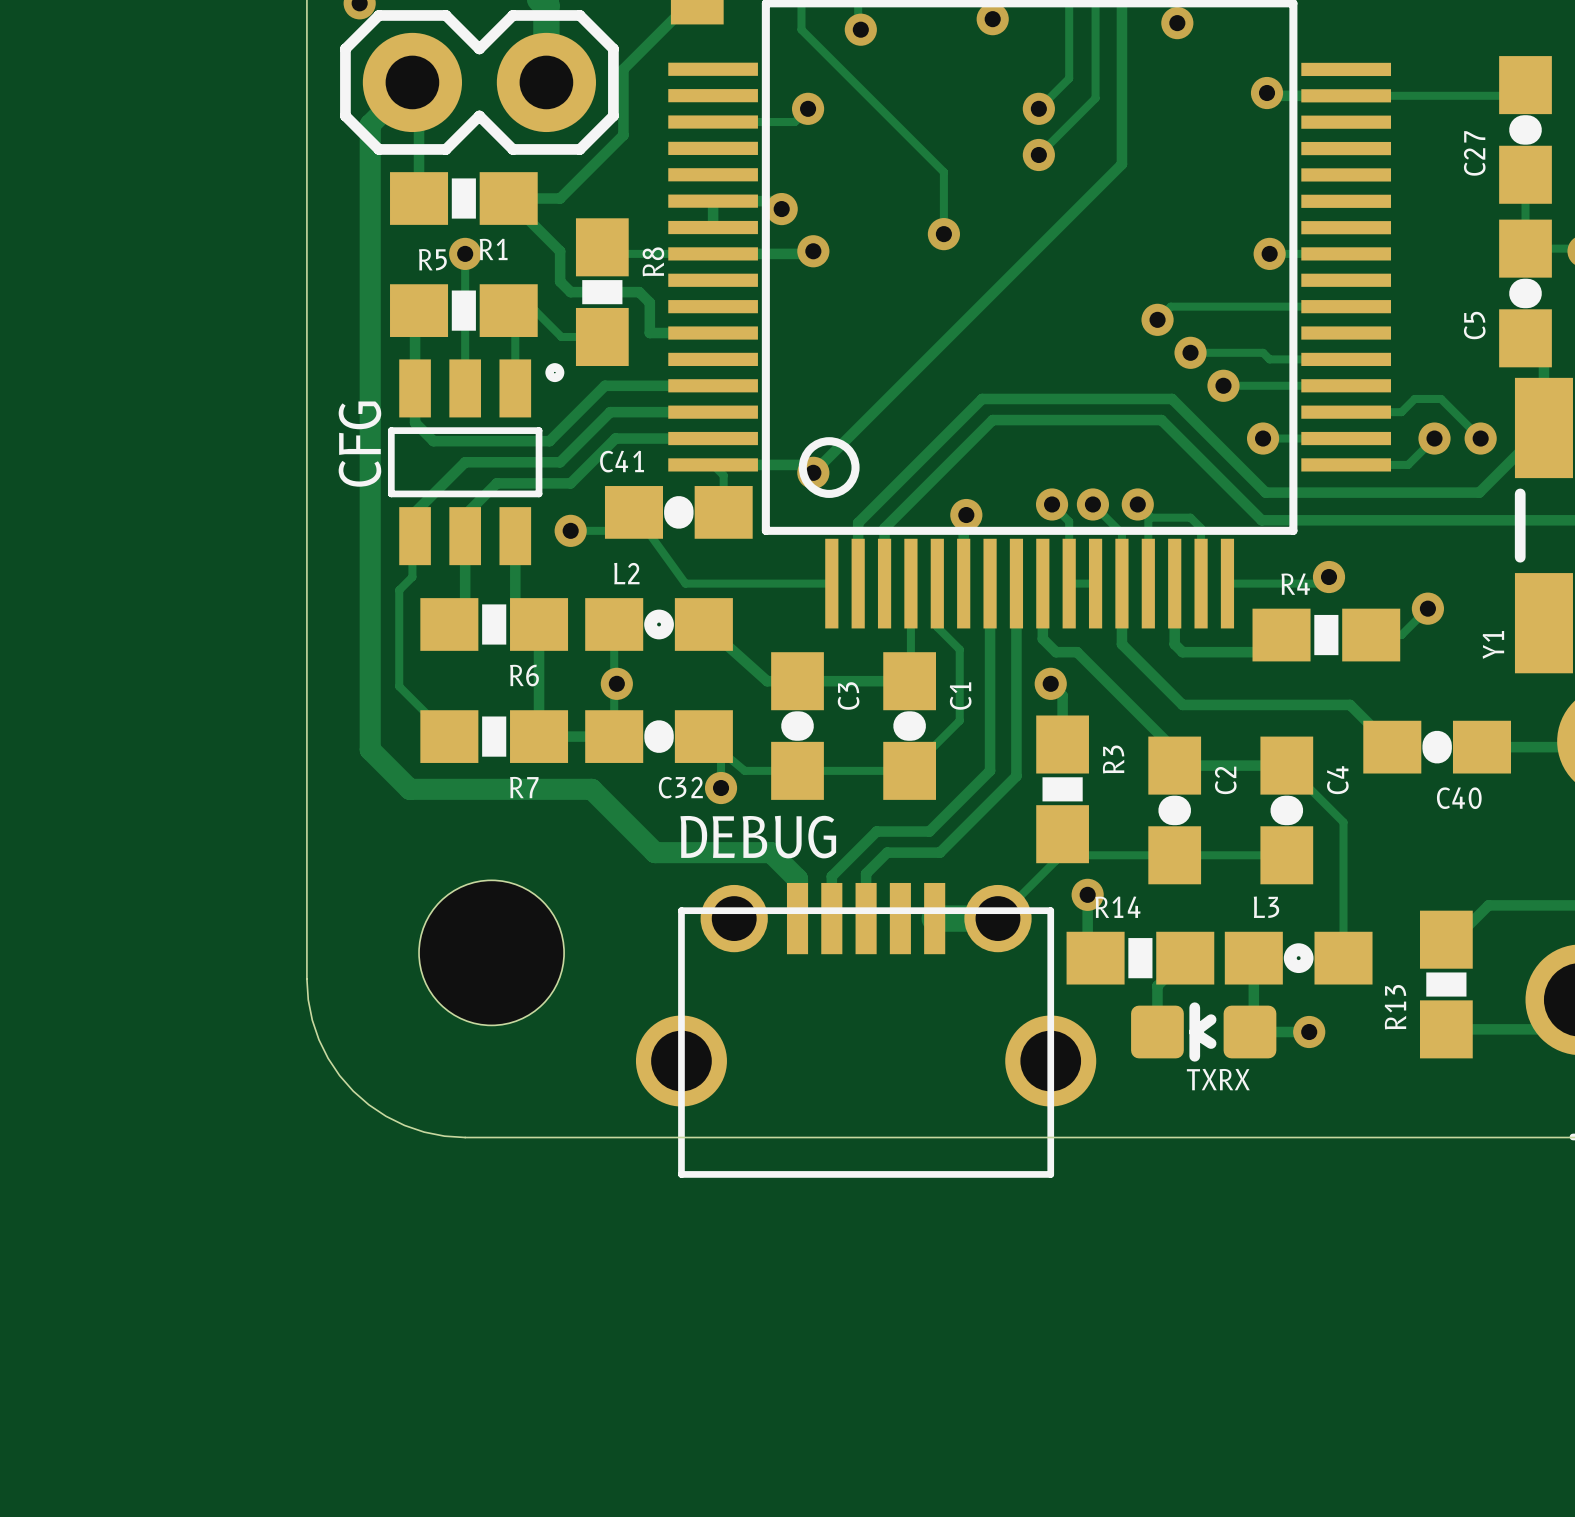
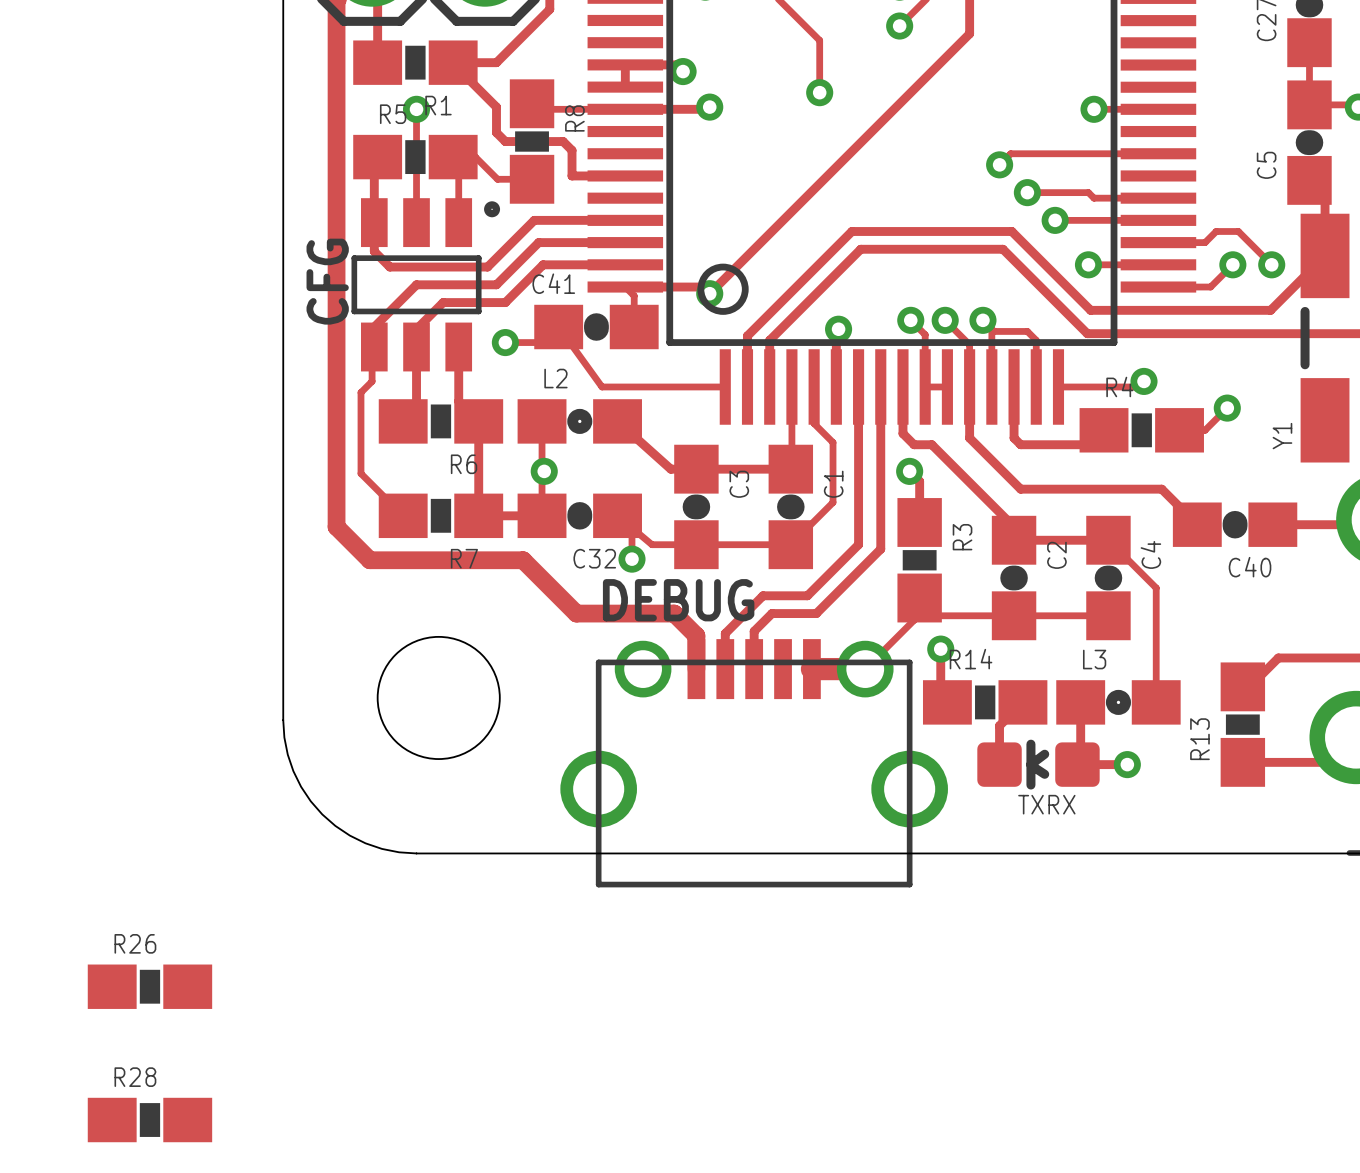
R26: none -> (149, 986)
R28: none -> (149, 1120)

